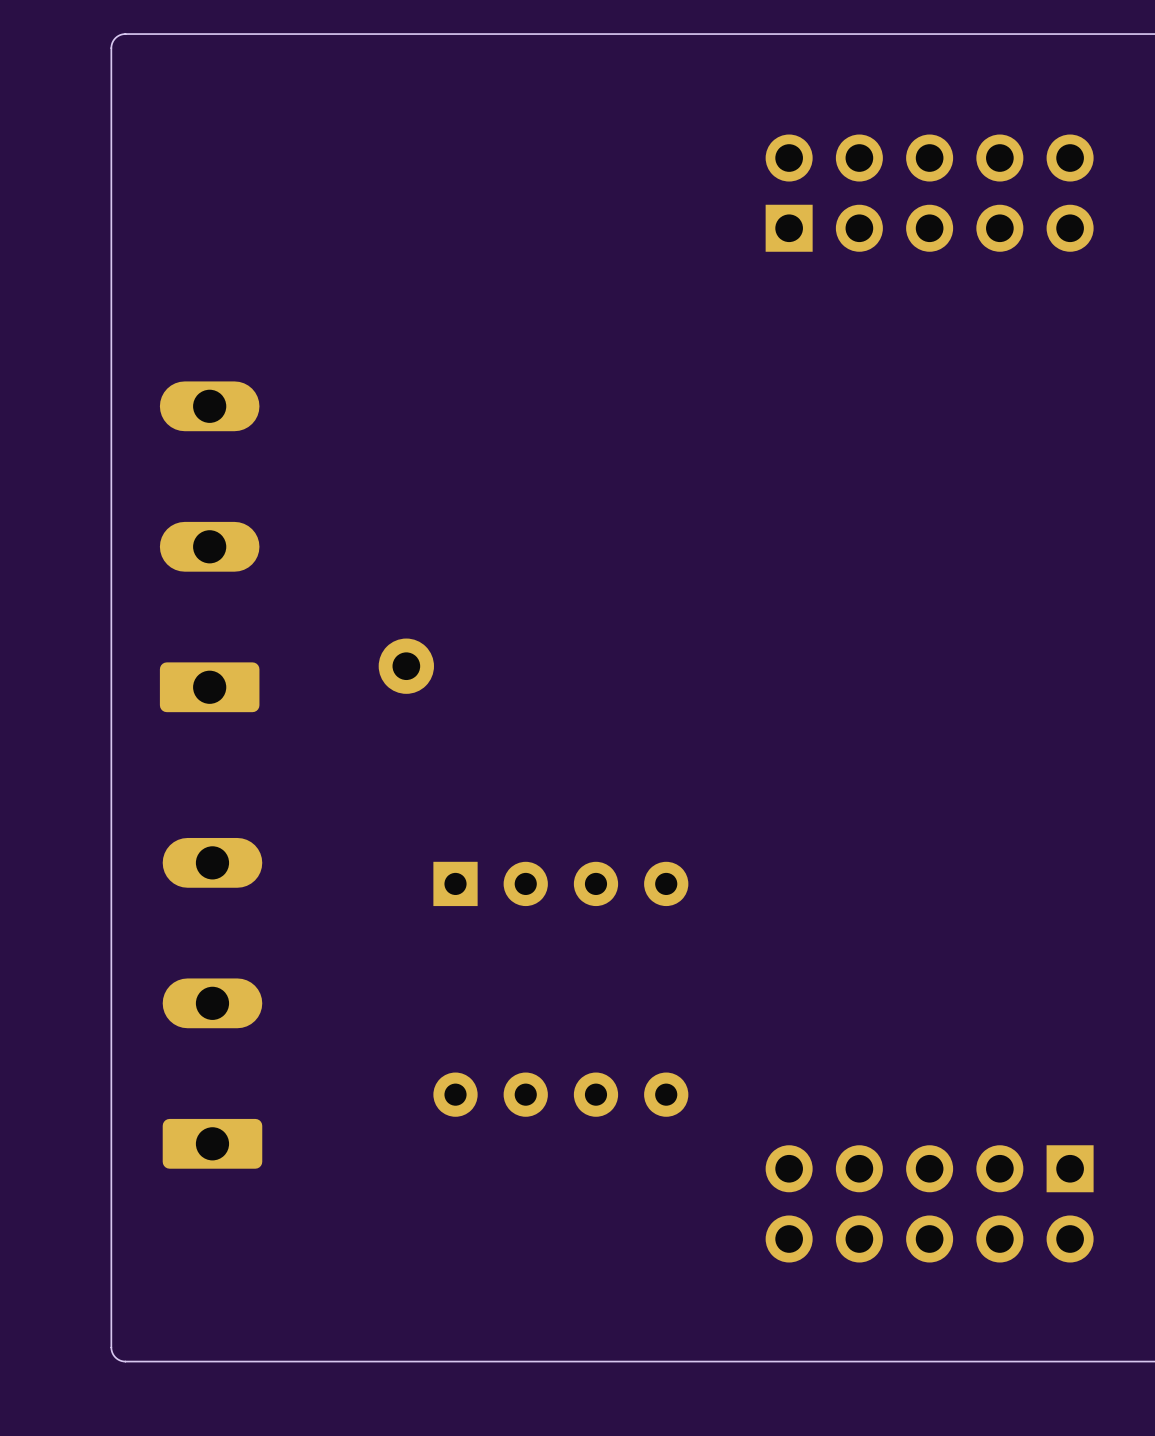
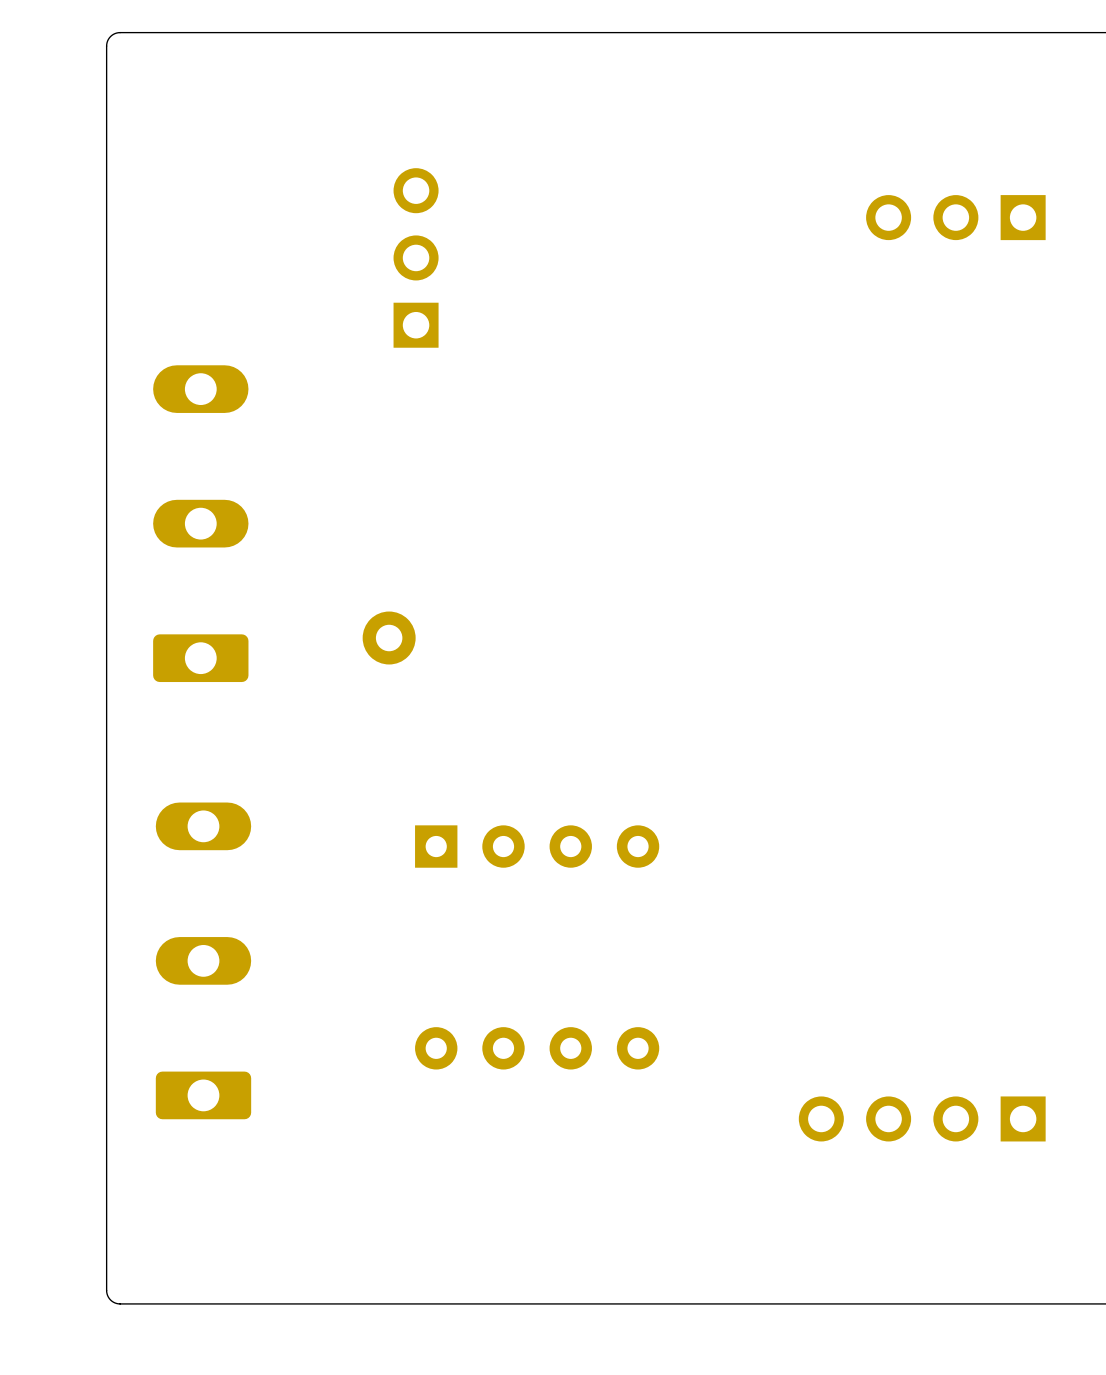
part: (929, 193) -> none
part: none -> (955, 217)
part: none -> (416, 257)
part: none -> (922, 1118)
part: (929, 1203) -> none

